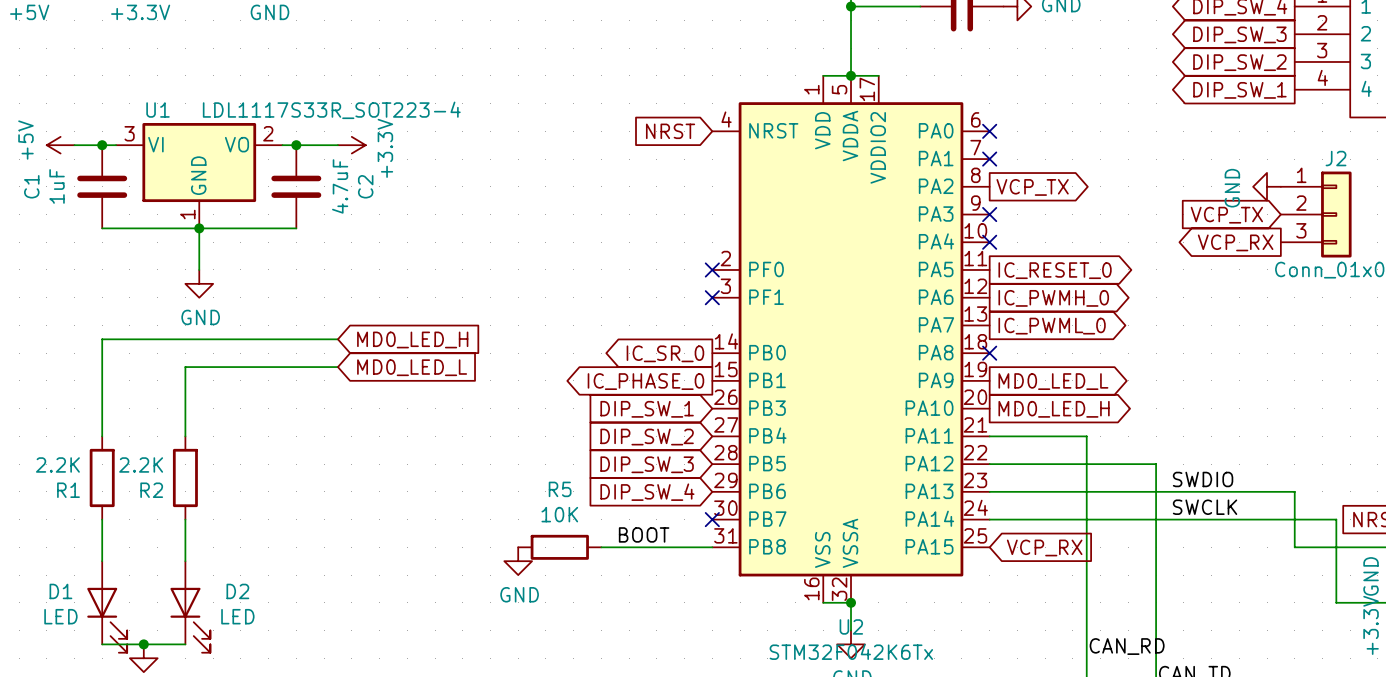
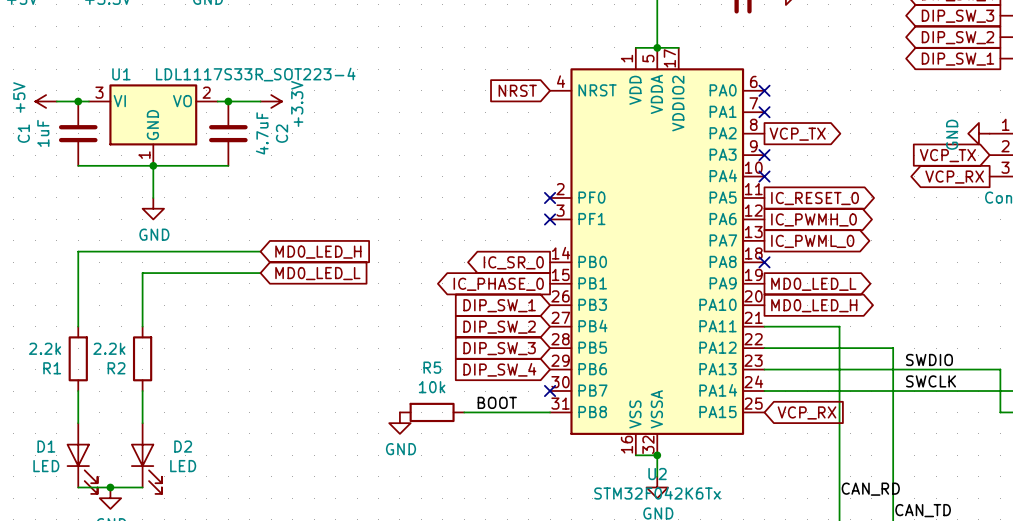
R1 value: 2.2K (57, 464) -> 2.2k (45, 348)
R2 value: 2.2K (141, 464) -> 2.2k (109, 348)
R5 value: 10K (559, 514) -> 10k (432, 387)

